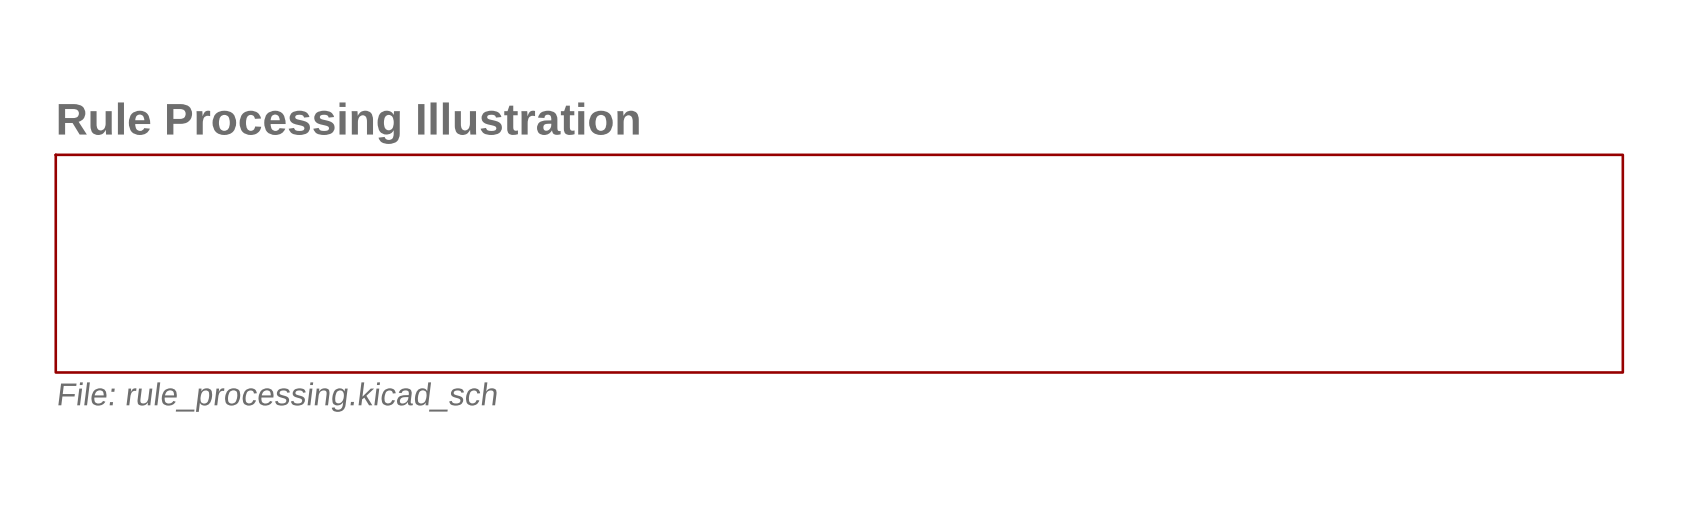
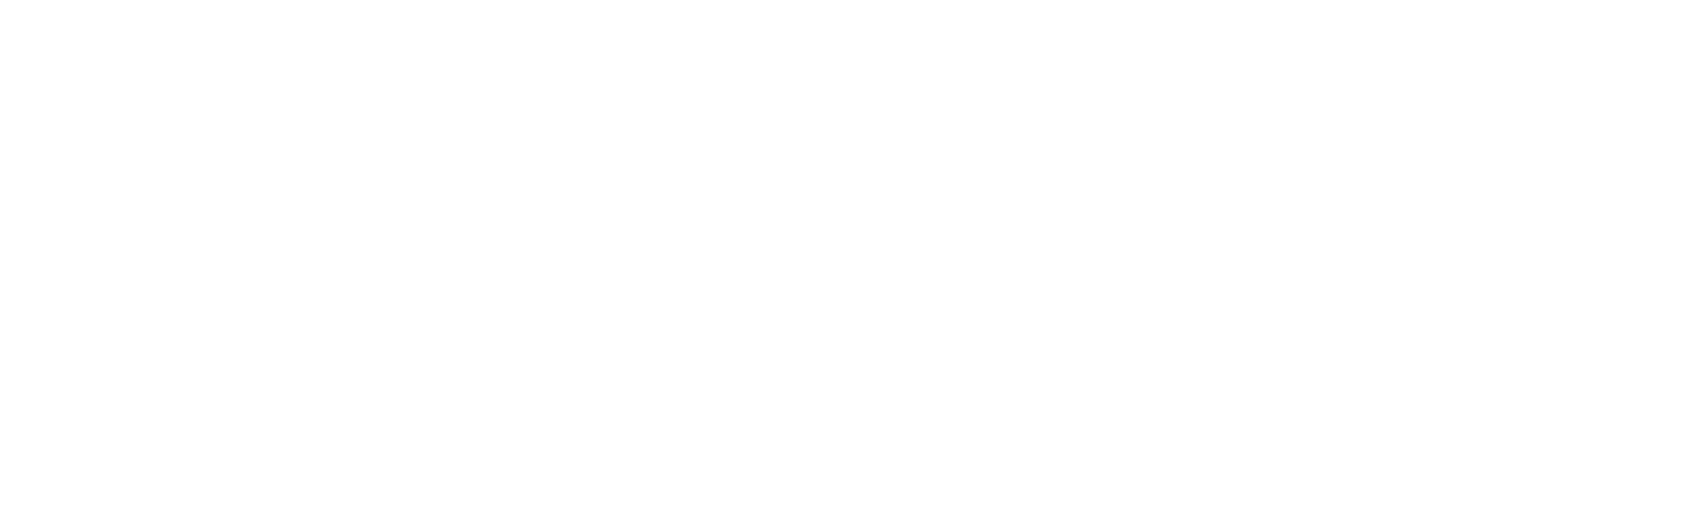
sheet Rule Processing Illustration: File: rule_processing.kicad_sch (839, 263) -> none

